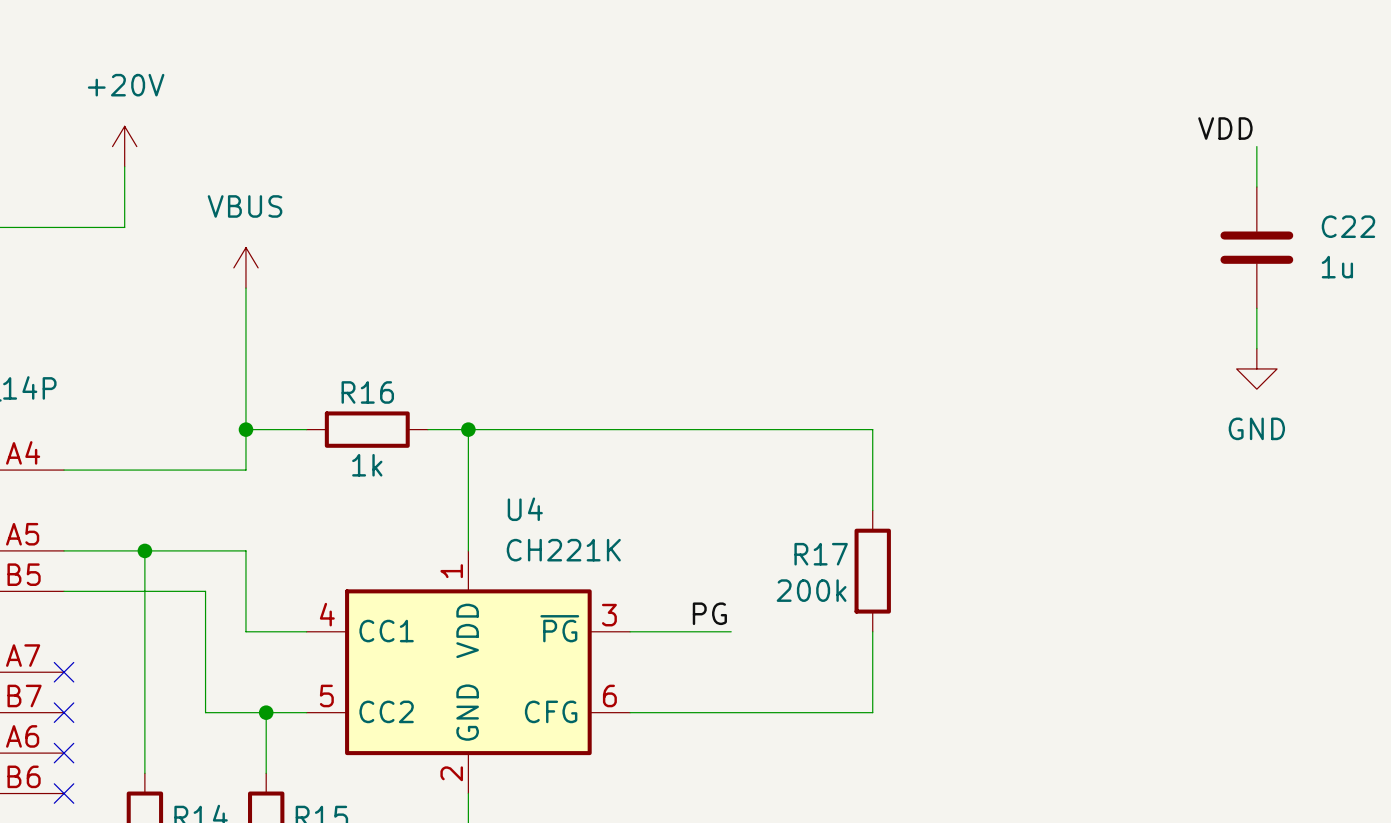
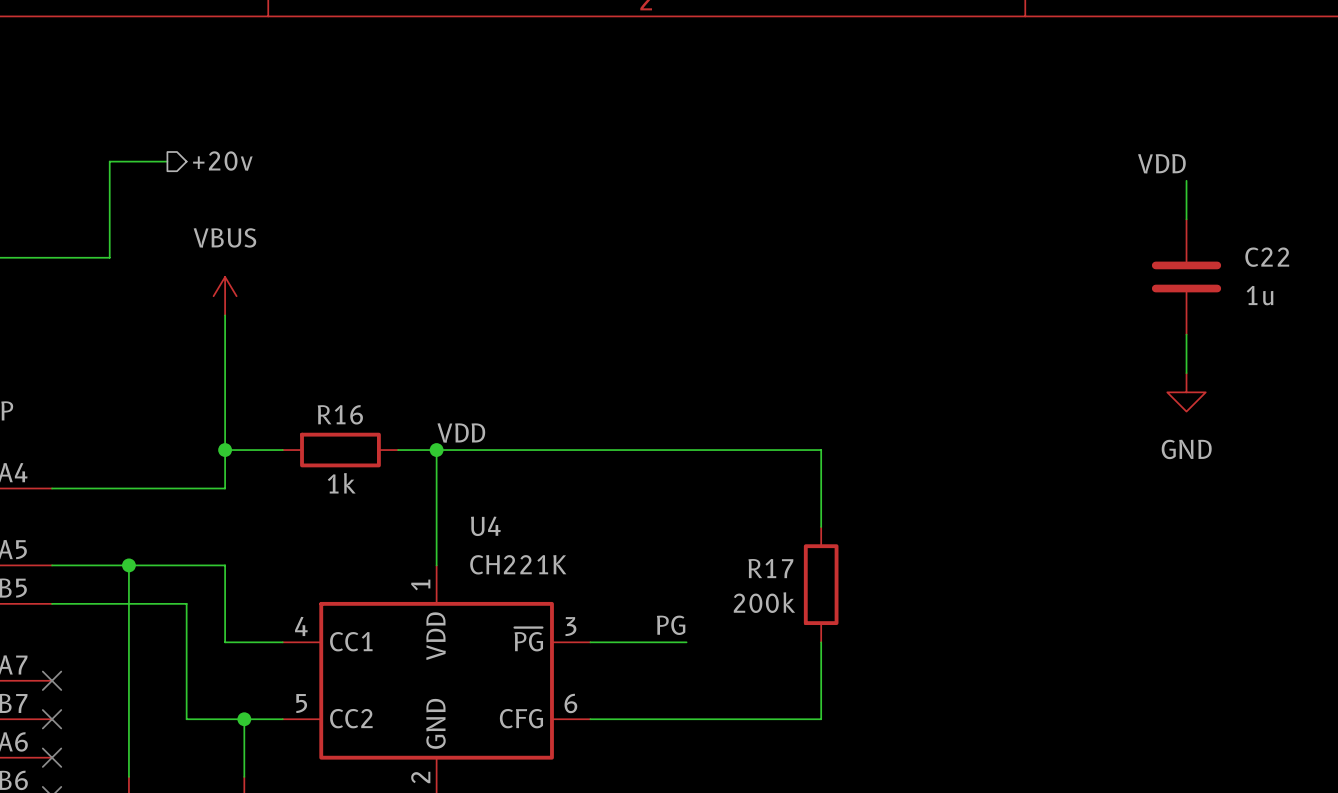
hierarchical label: none -> +20v (222, 161)
wire: none -> (167, 161) (109, 161) (109, 200)
power symbol: +20V (124, 146) -> none
label: none -> VDD (461, 433)

